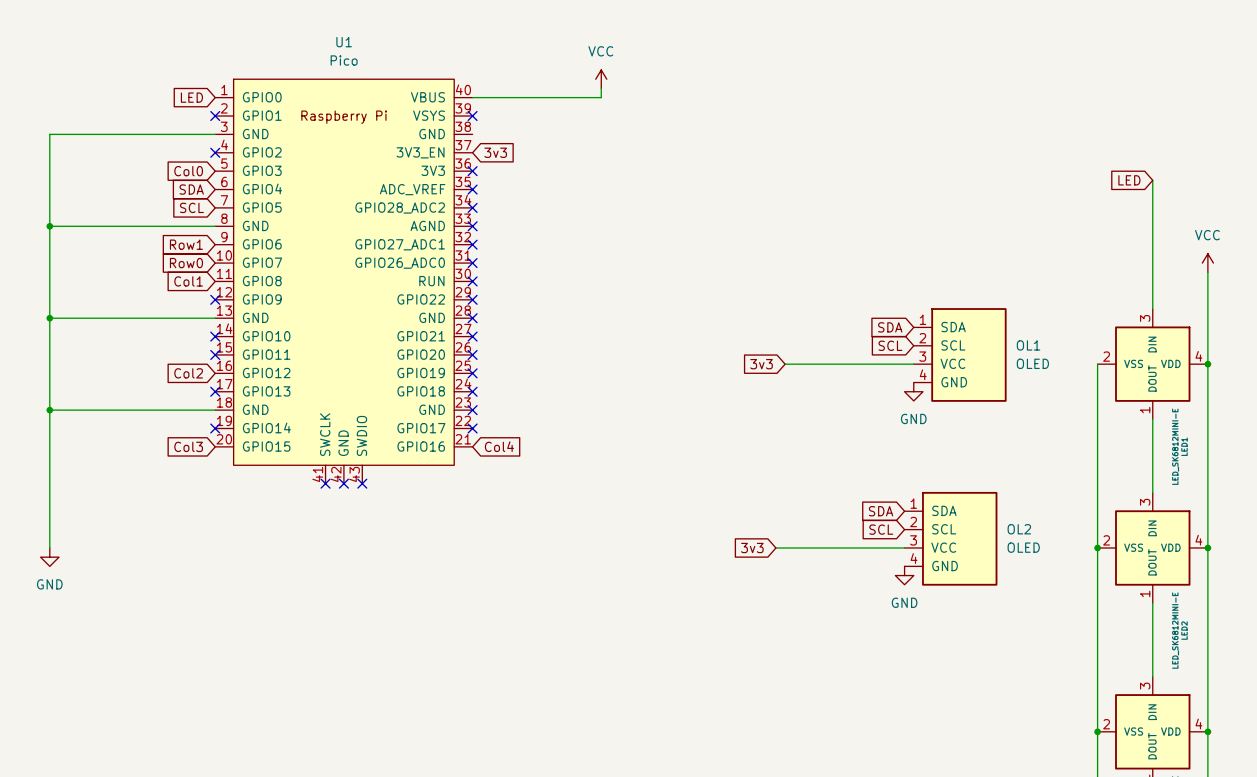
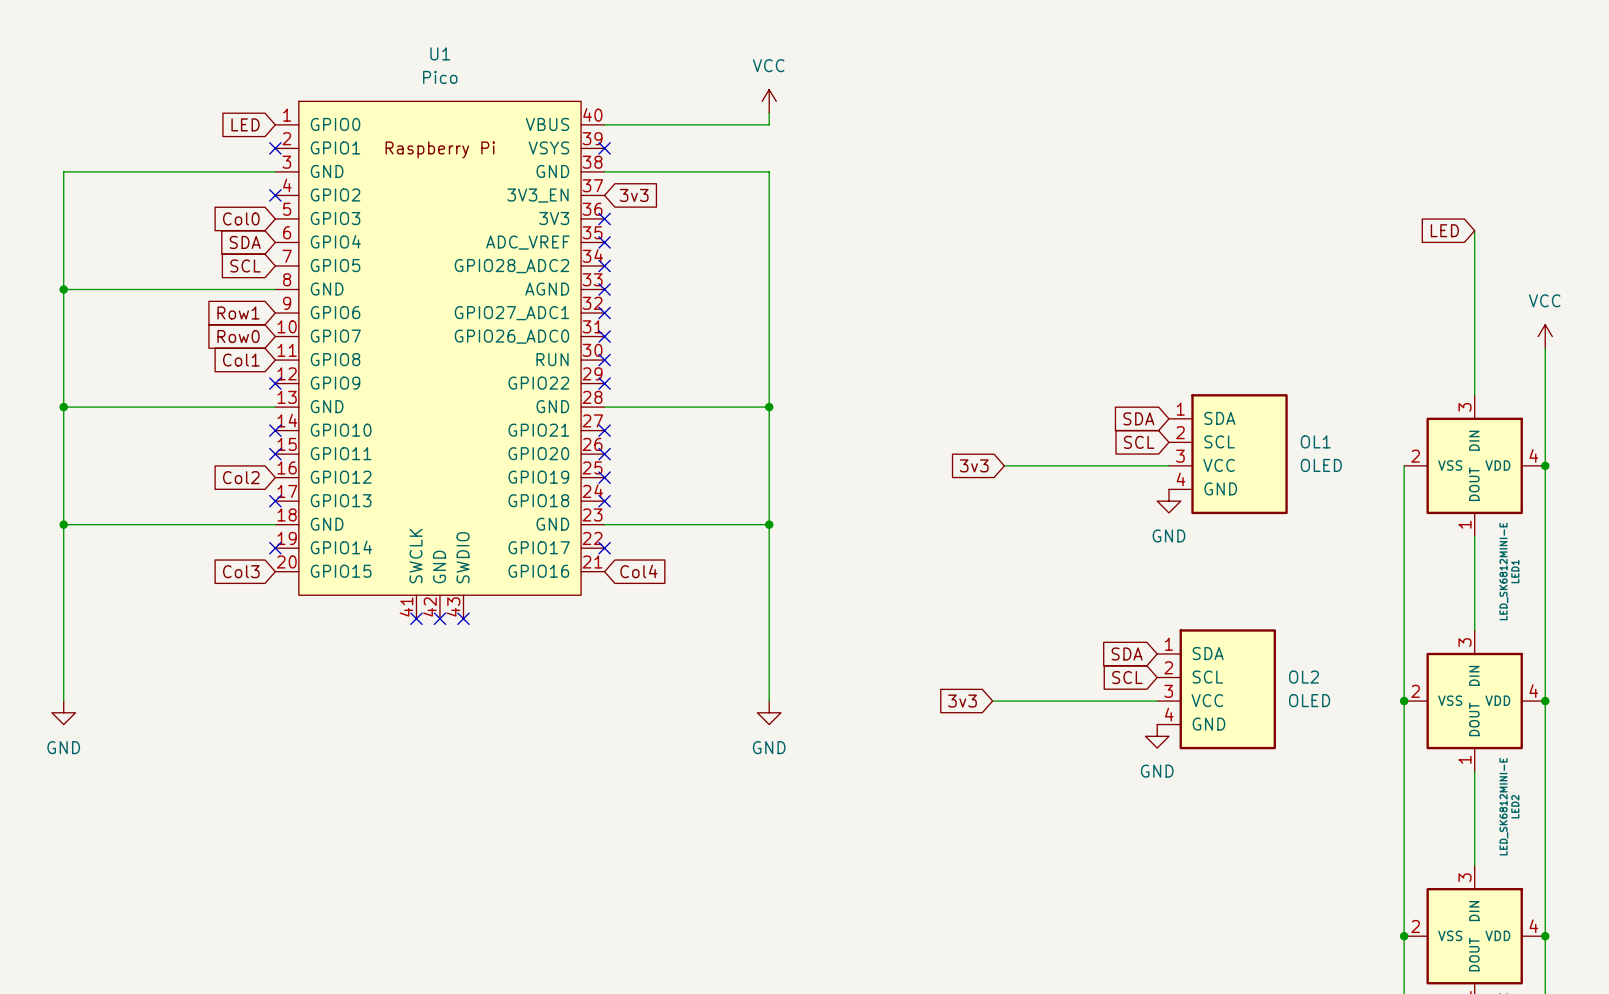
wire: none -> (604, 171) (769, 171) (769, 701)
wire: none -> (604, 407) (769, 407)
no-connect mark: (472, 318) -> none
junction: none -> (769, 407)
wire: none -> (604, 524) (769, 524)
no-connect mark: (472, 410) -> none
junction: none -> (769, 524)
power symbol: none -> GND (769, 712)

